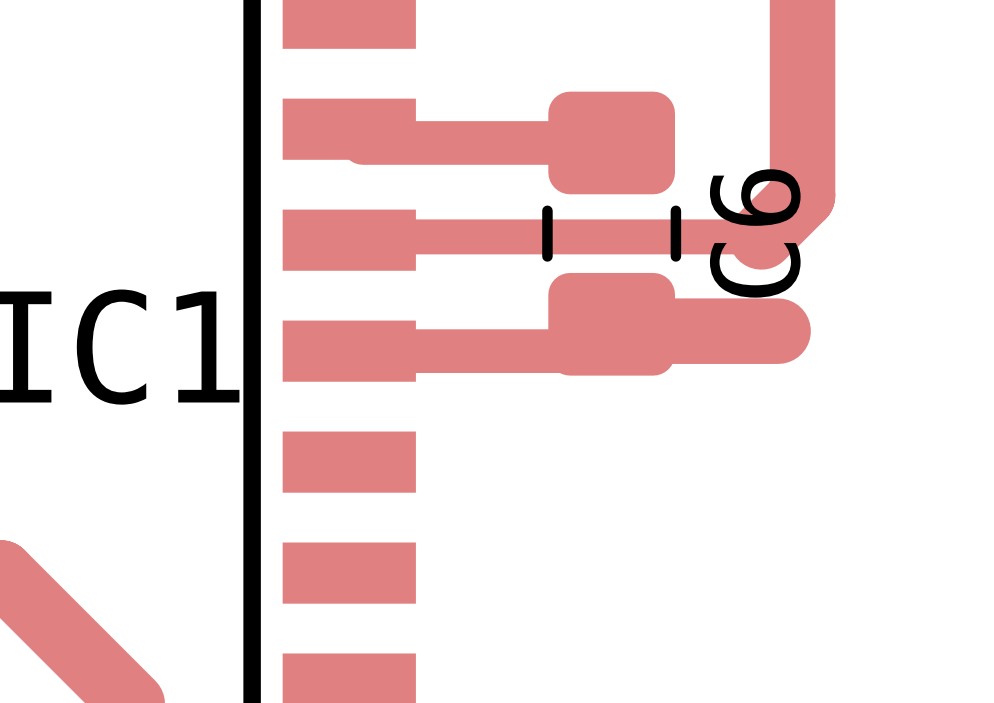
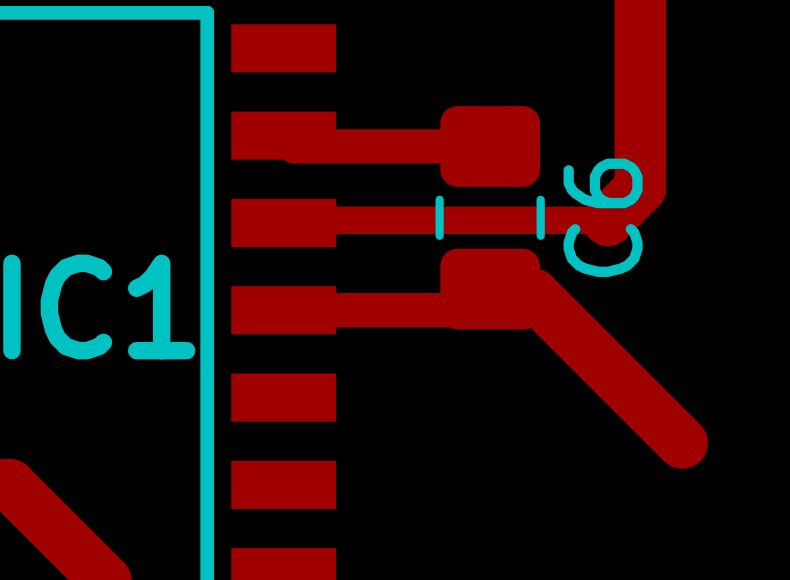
track: (667, 331) (778, 331) -> (533, 294) (682, 443)

